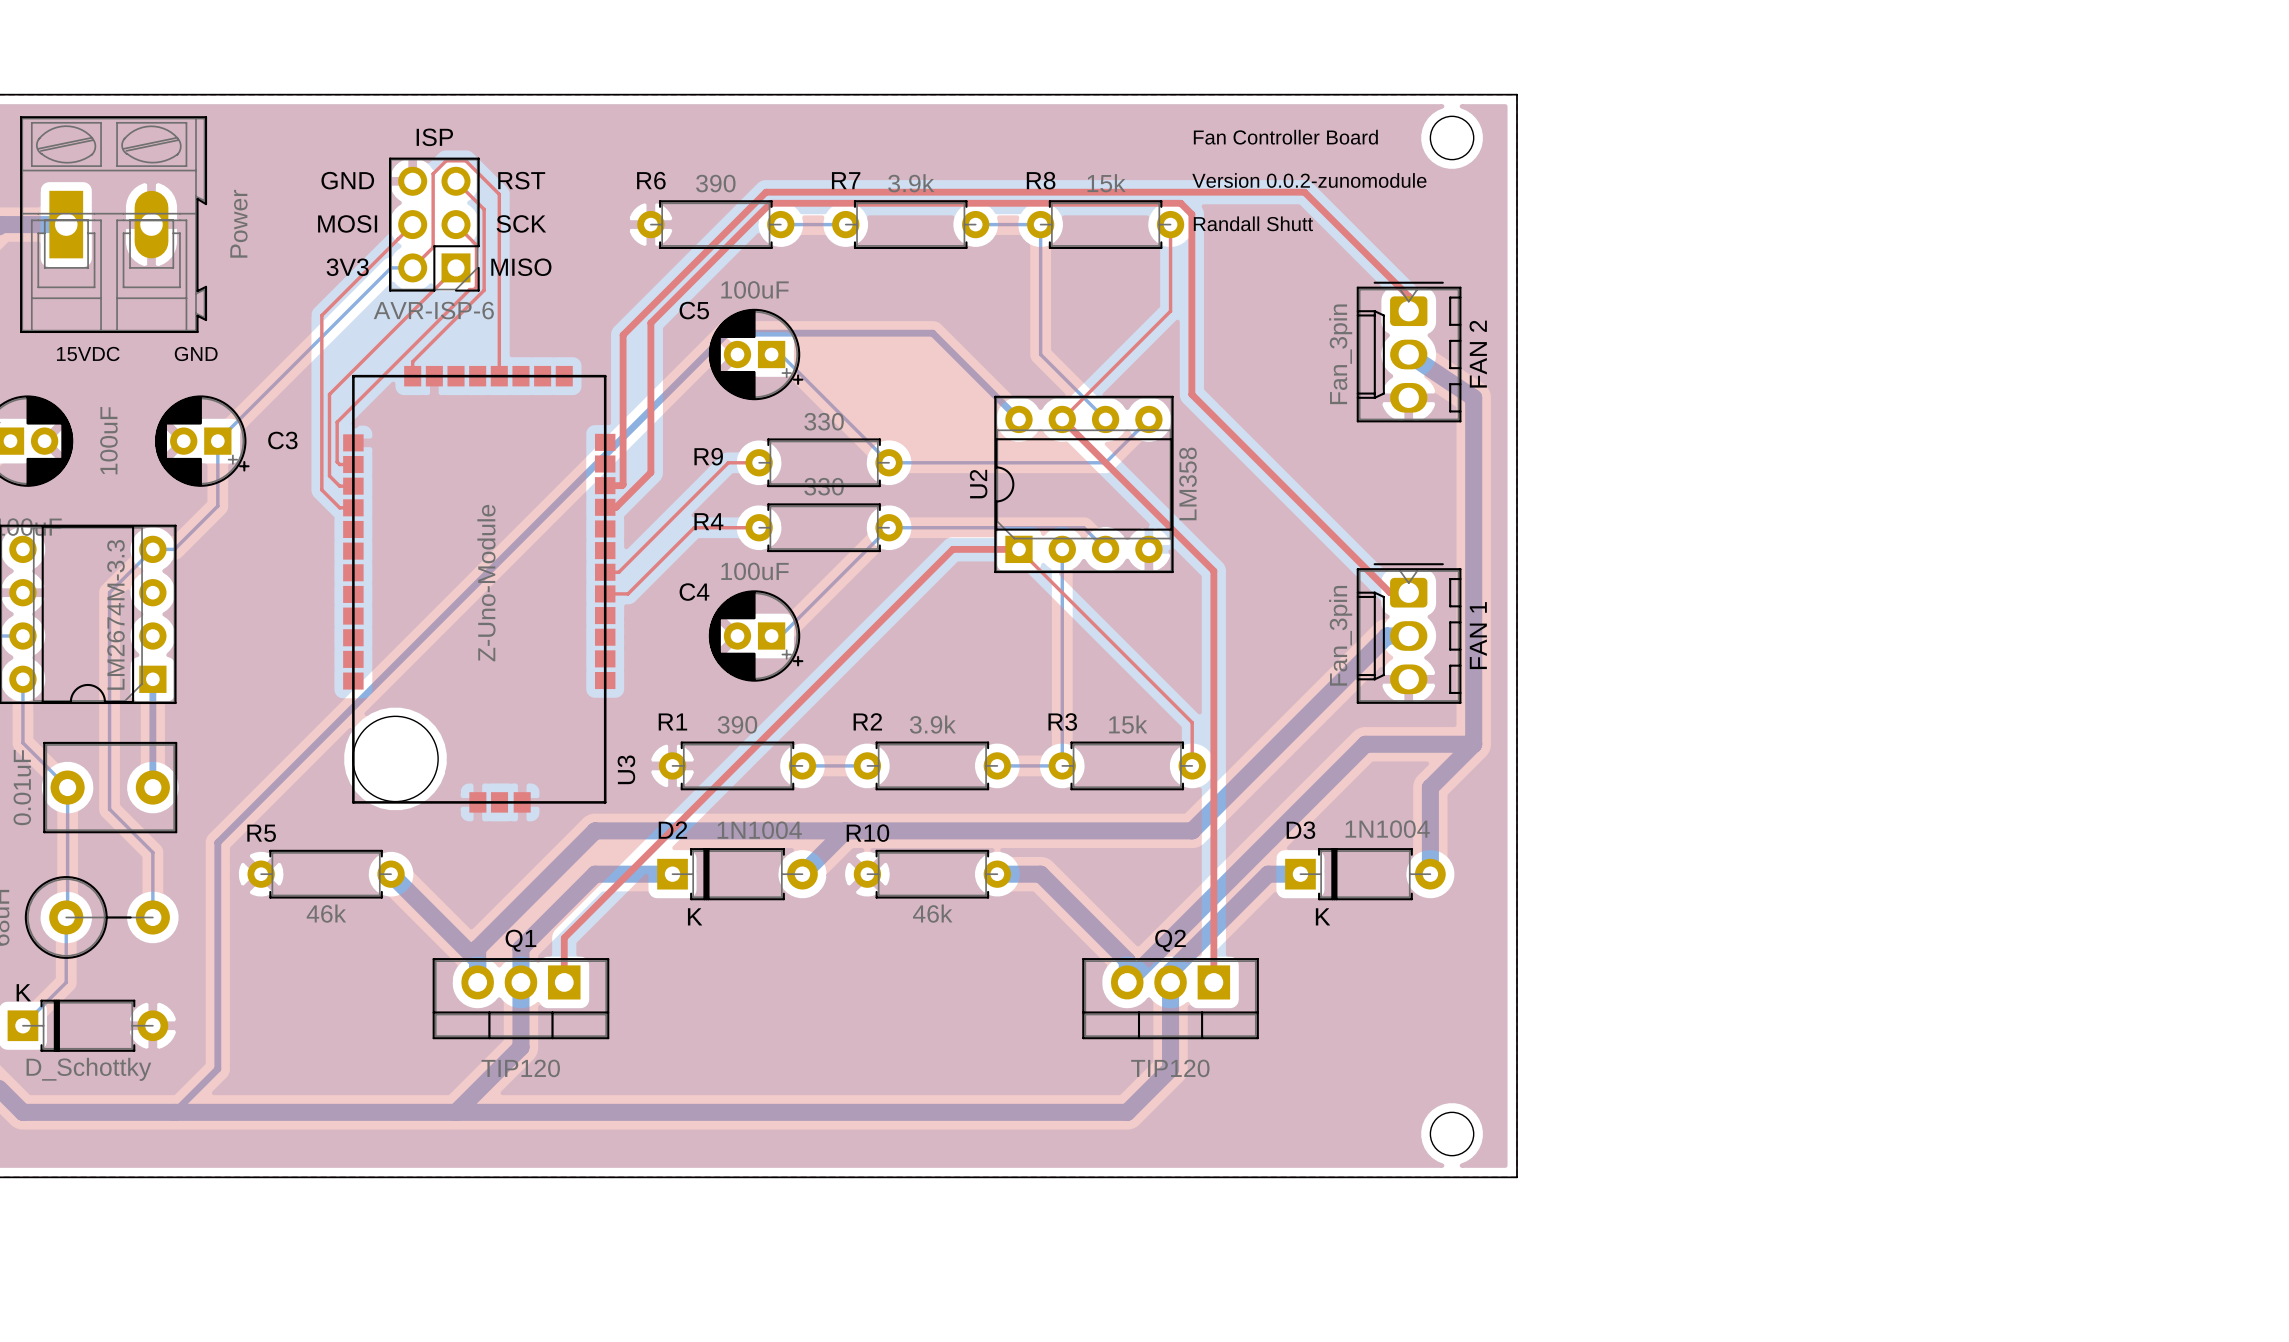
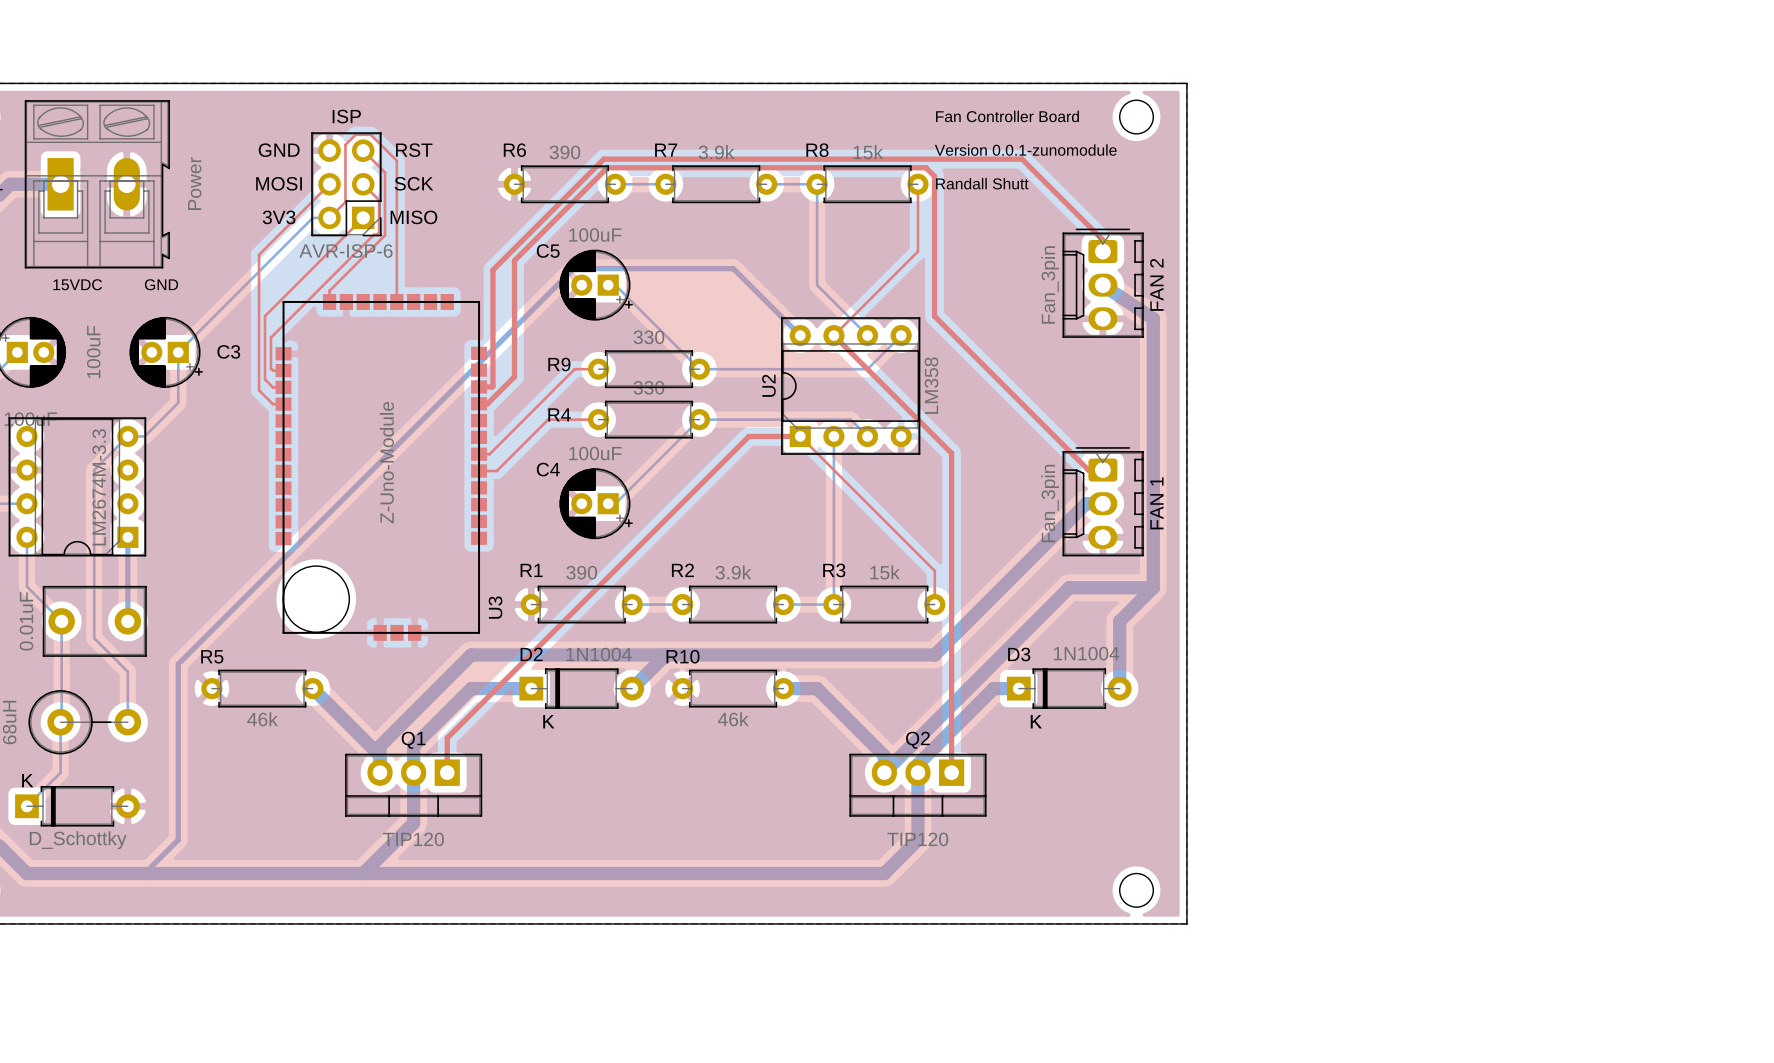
text: Version 0.0.2-zunomodule (1309, 180) -> Version 0.0.1-zunomodule (1025, 150)

